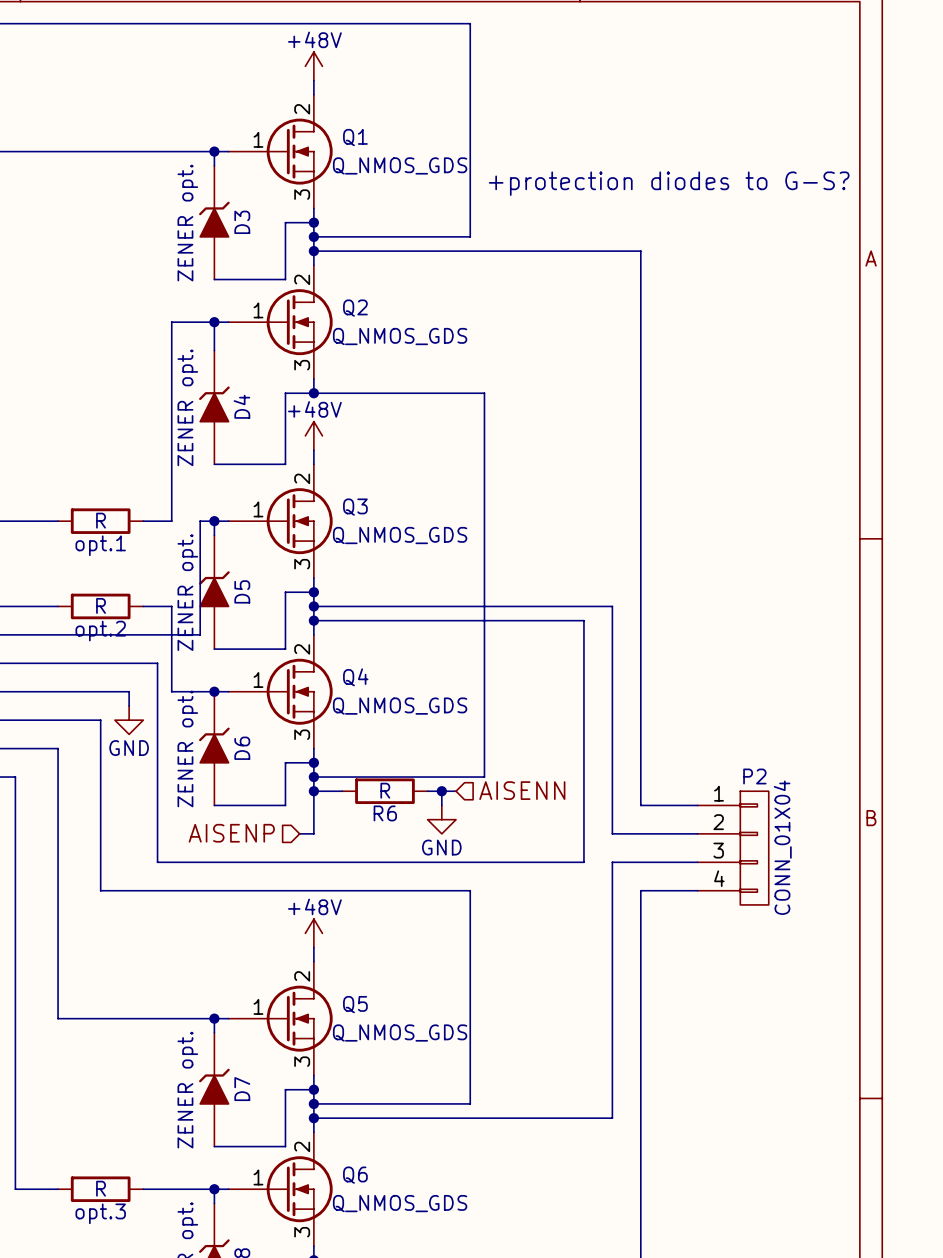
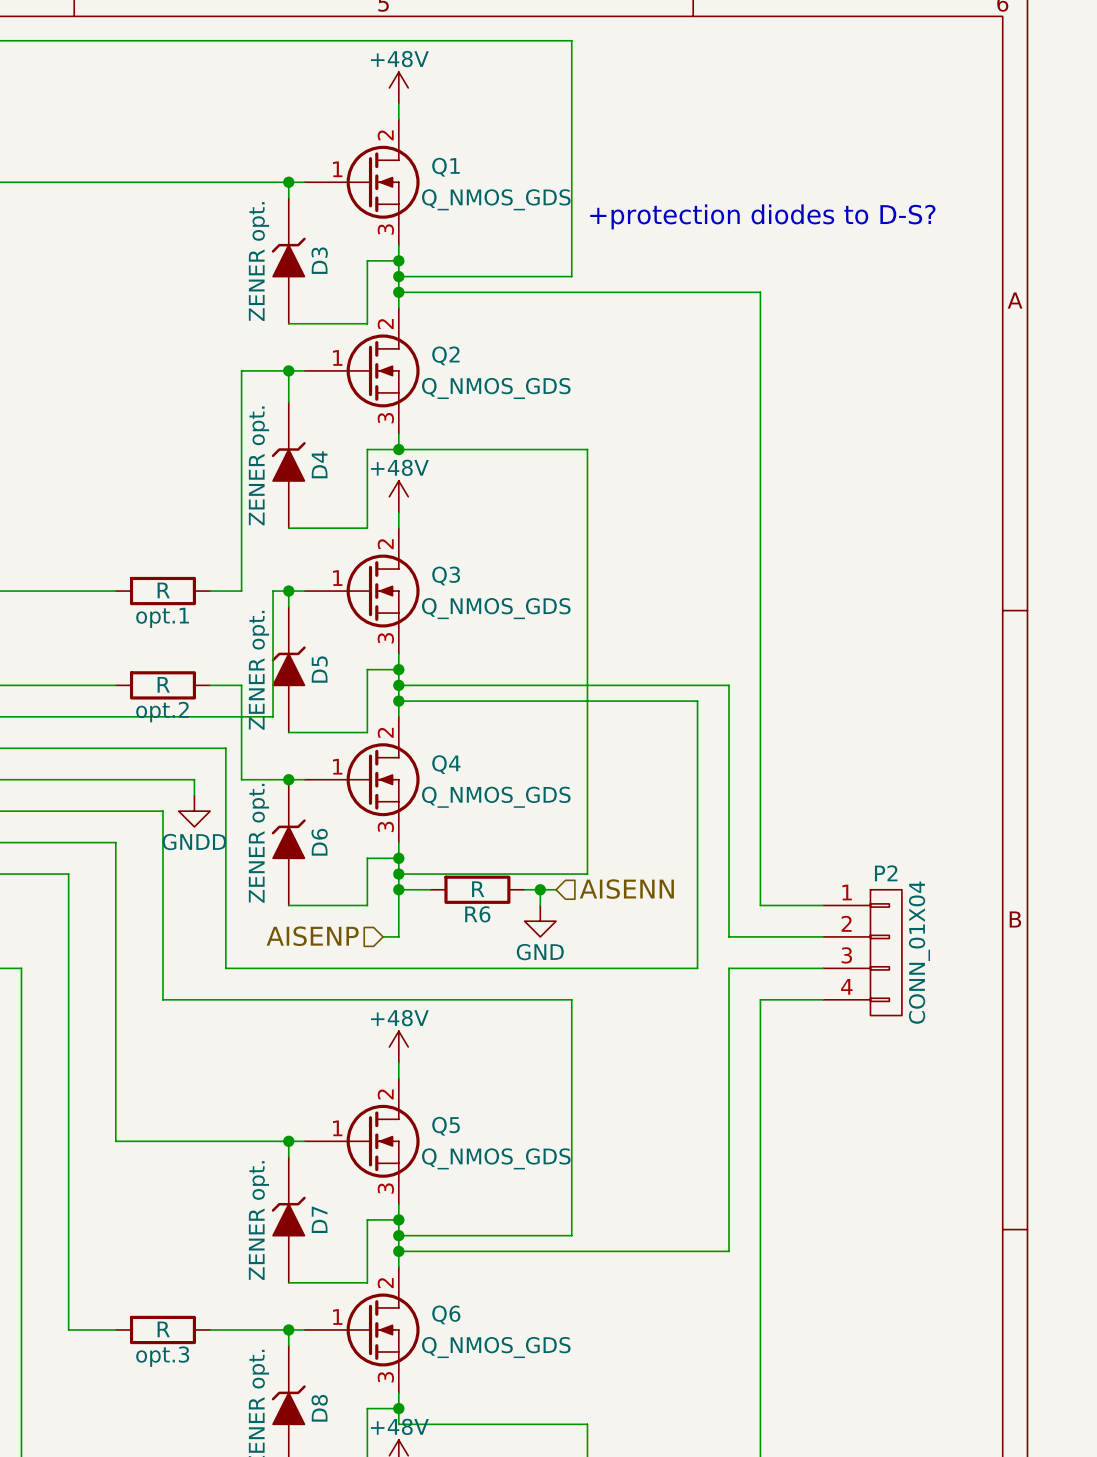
text: +protection diodes to G-S? (669, 183) -> +protection diodes to D-S? (762, 216)
power symbol: GND (129, 720) -> GNDD (194, 811)

